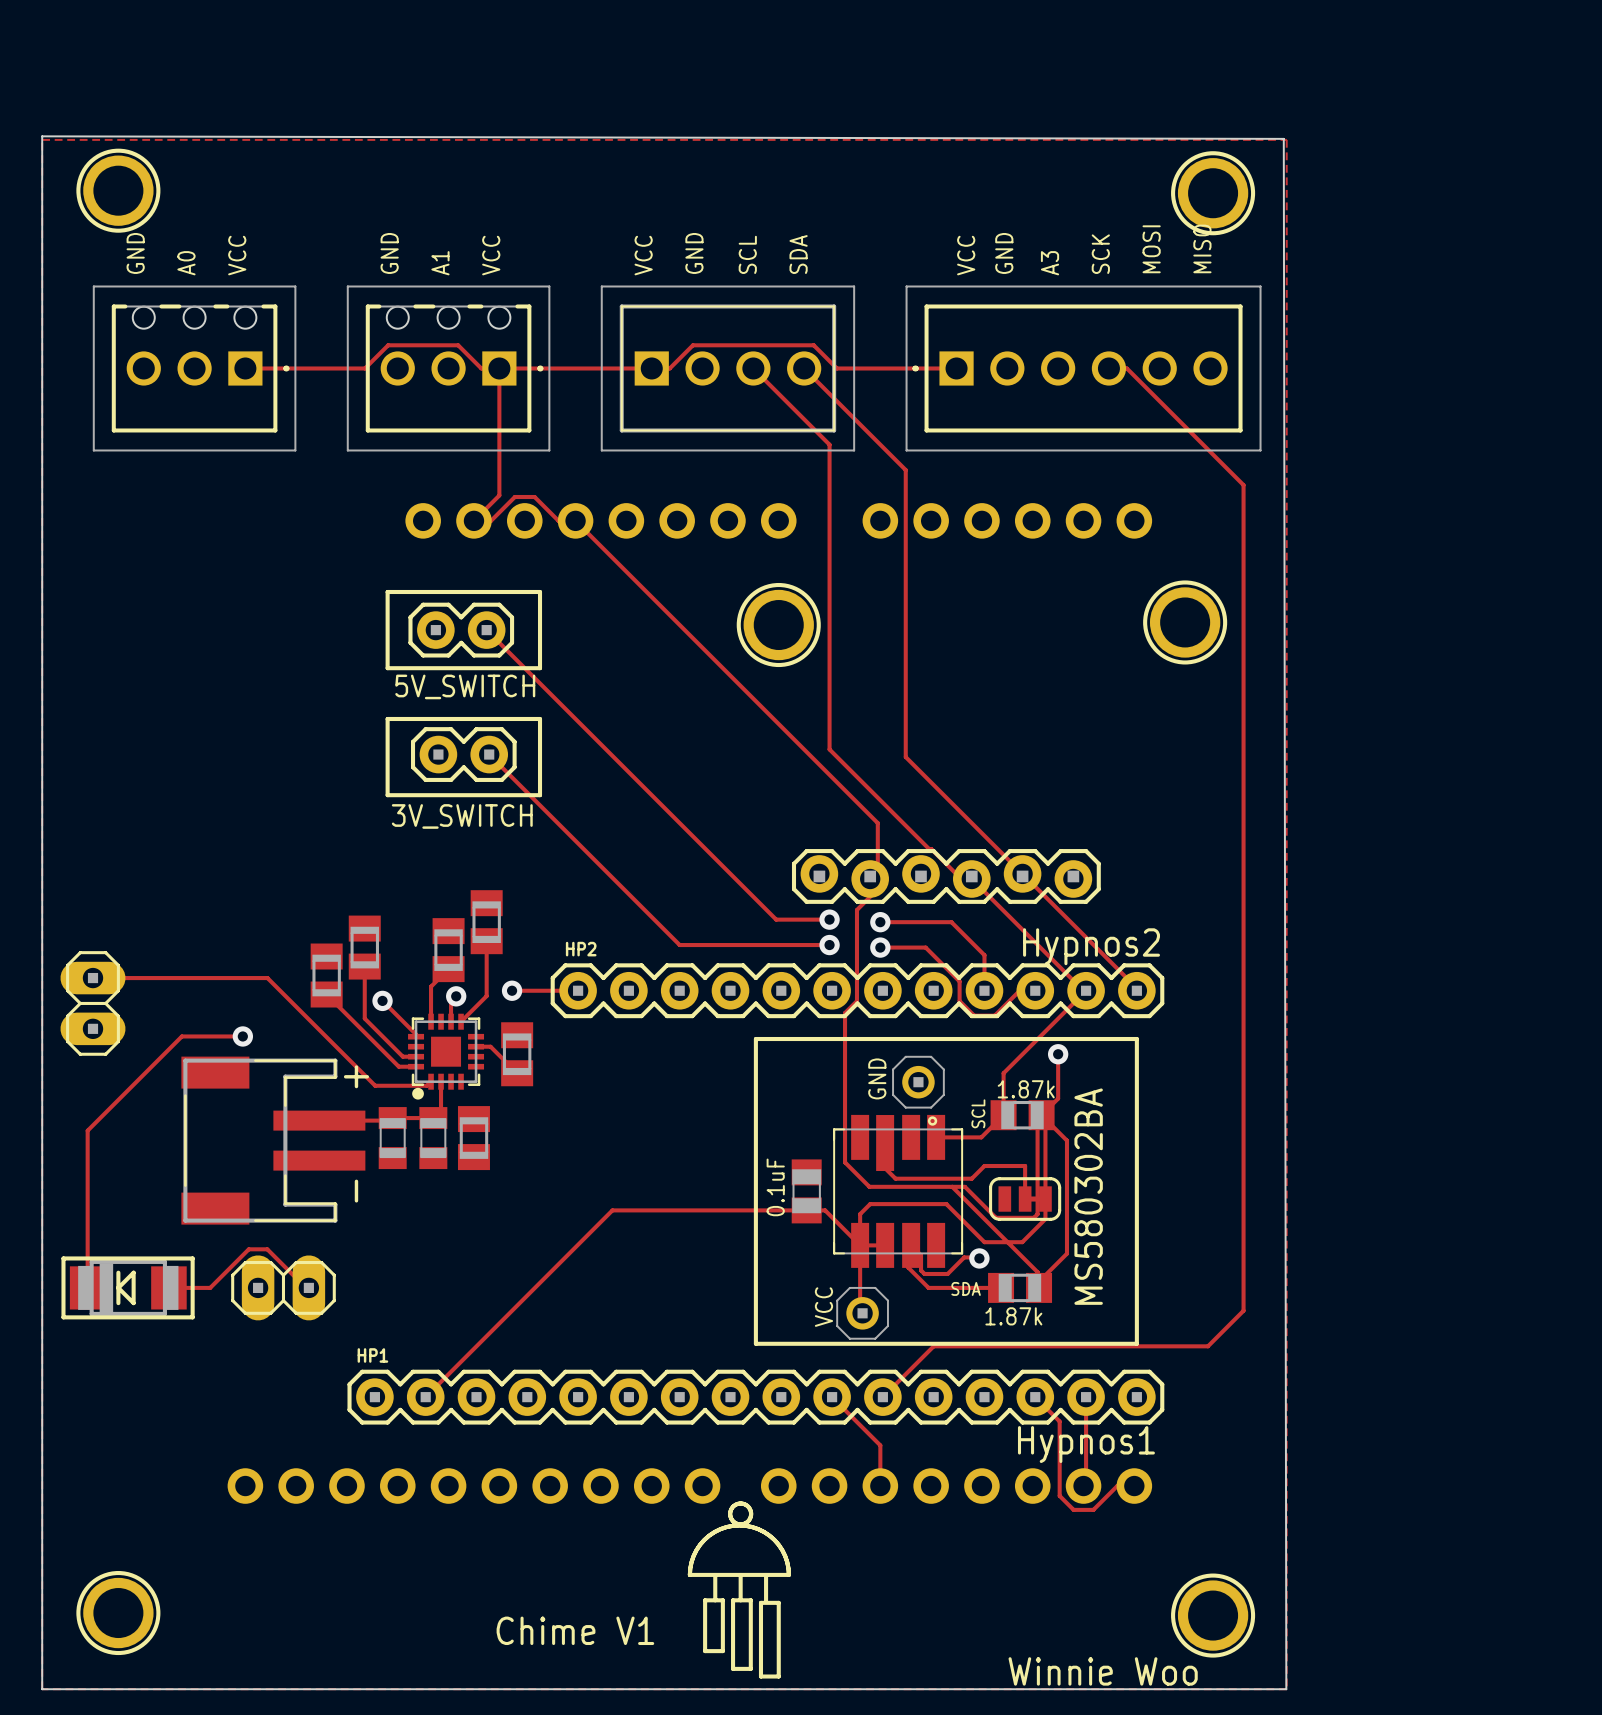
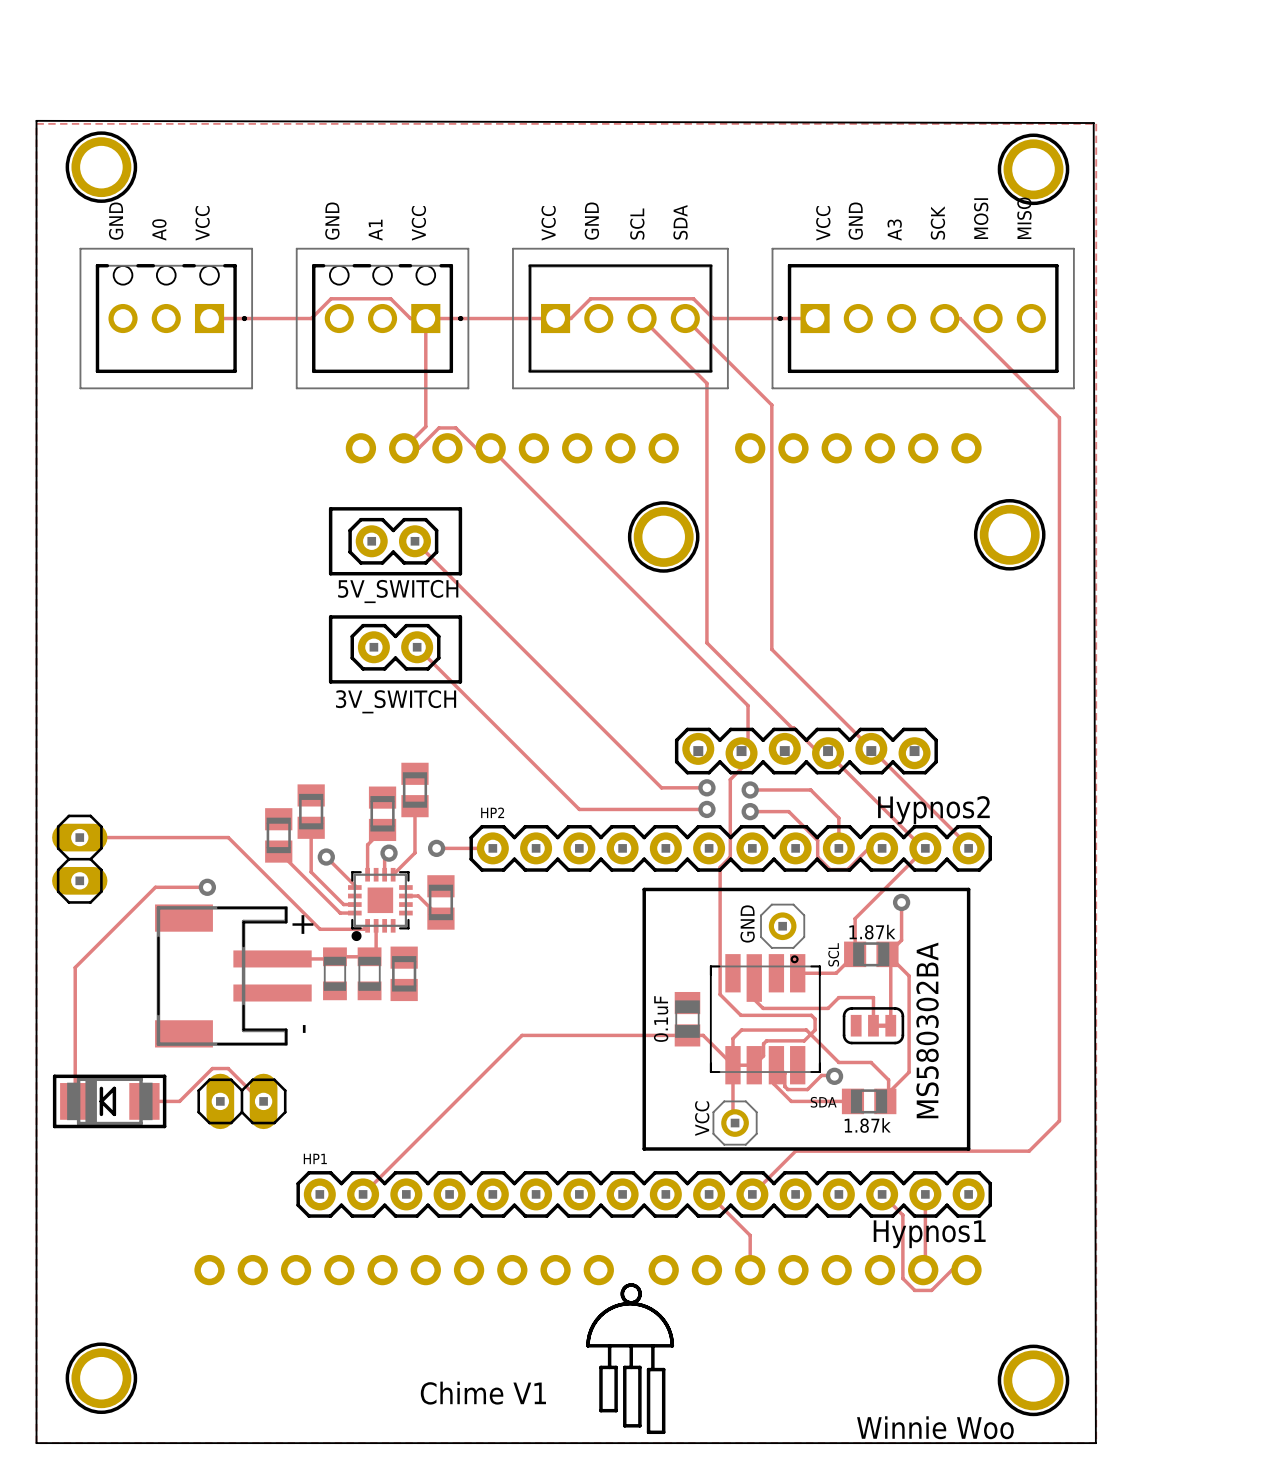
track: (1037, 1119) (1037, 1214) (1034, 1217) (995, 1217) (964, 1186) (952, 1186) -> none
track: (956, 1191) (1037, 1272) (1037, 1282) -> (815, 1019) (815, 1030) (804, 1040) (766, 1040) (763, 1043) (763, 1055) (754, 1065)
track: (1045, 1199) (1045, 1219) (1022, 1242) -> (888, 1092) (888, 1080) (871, 1062)

